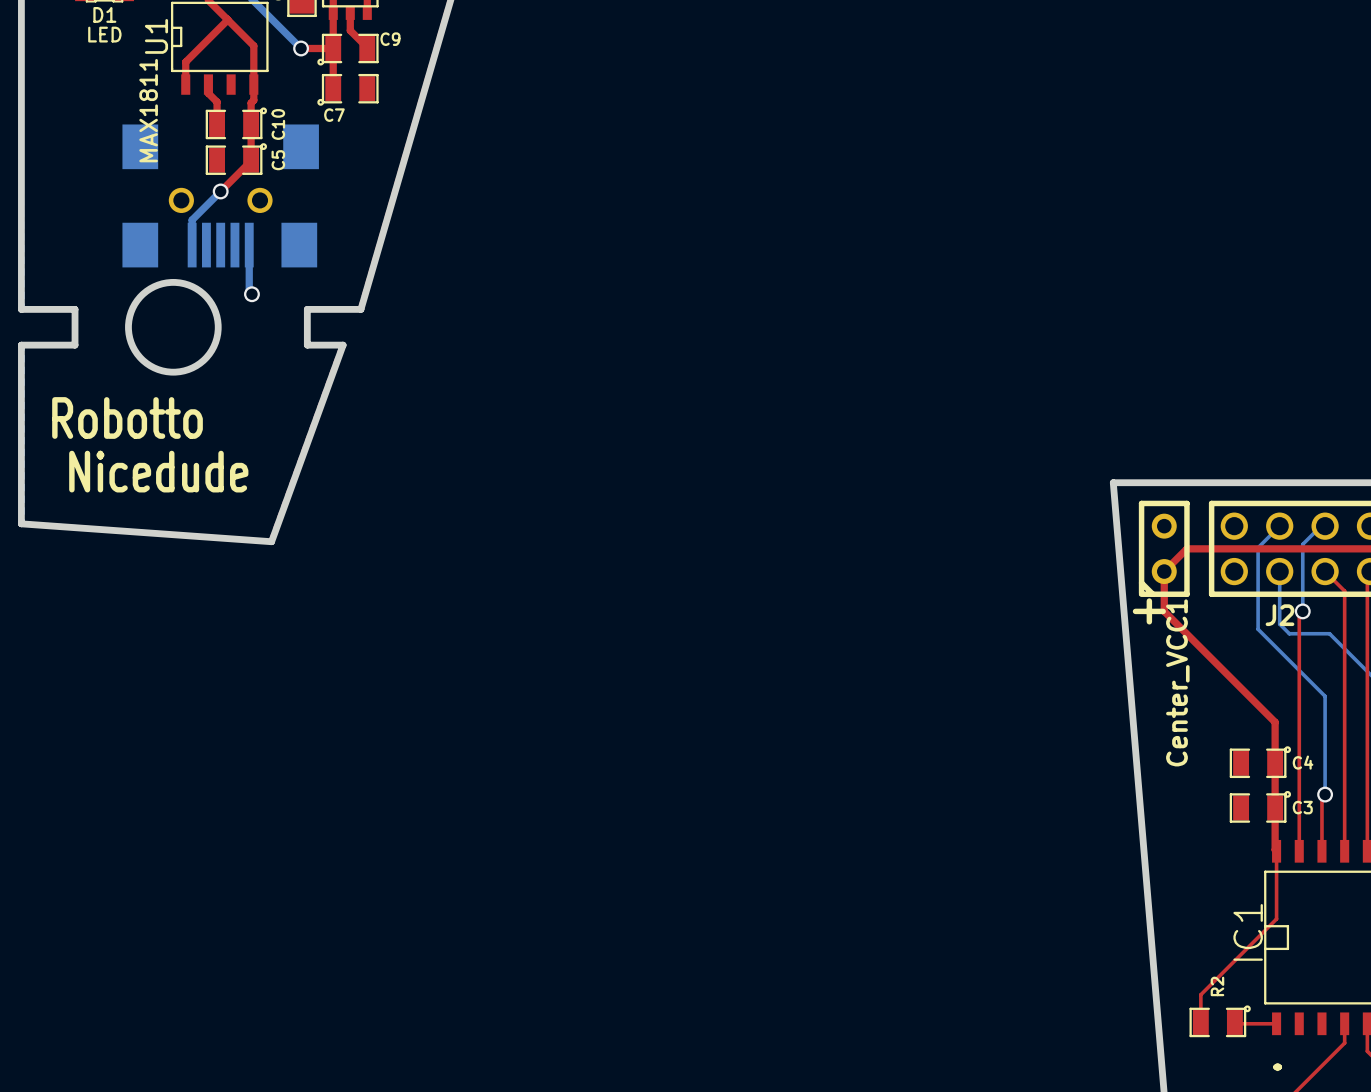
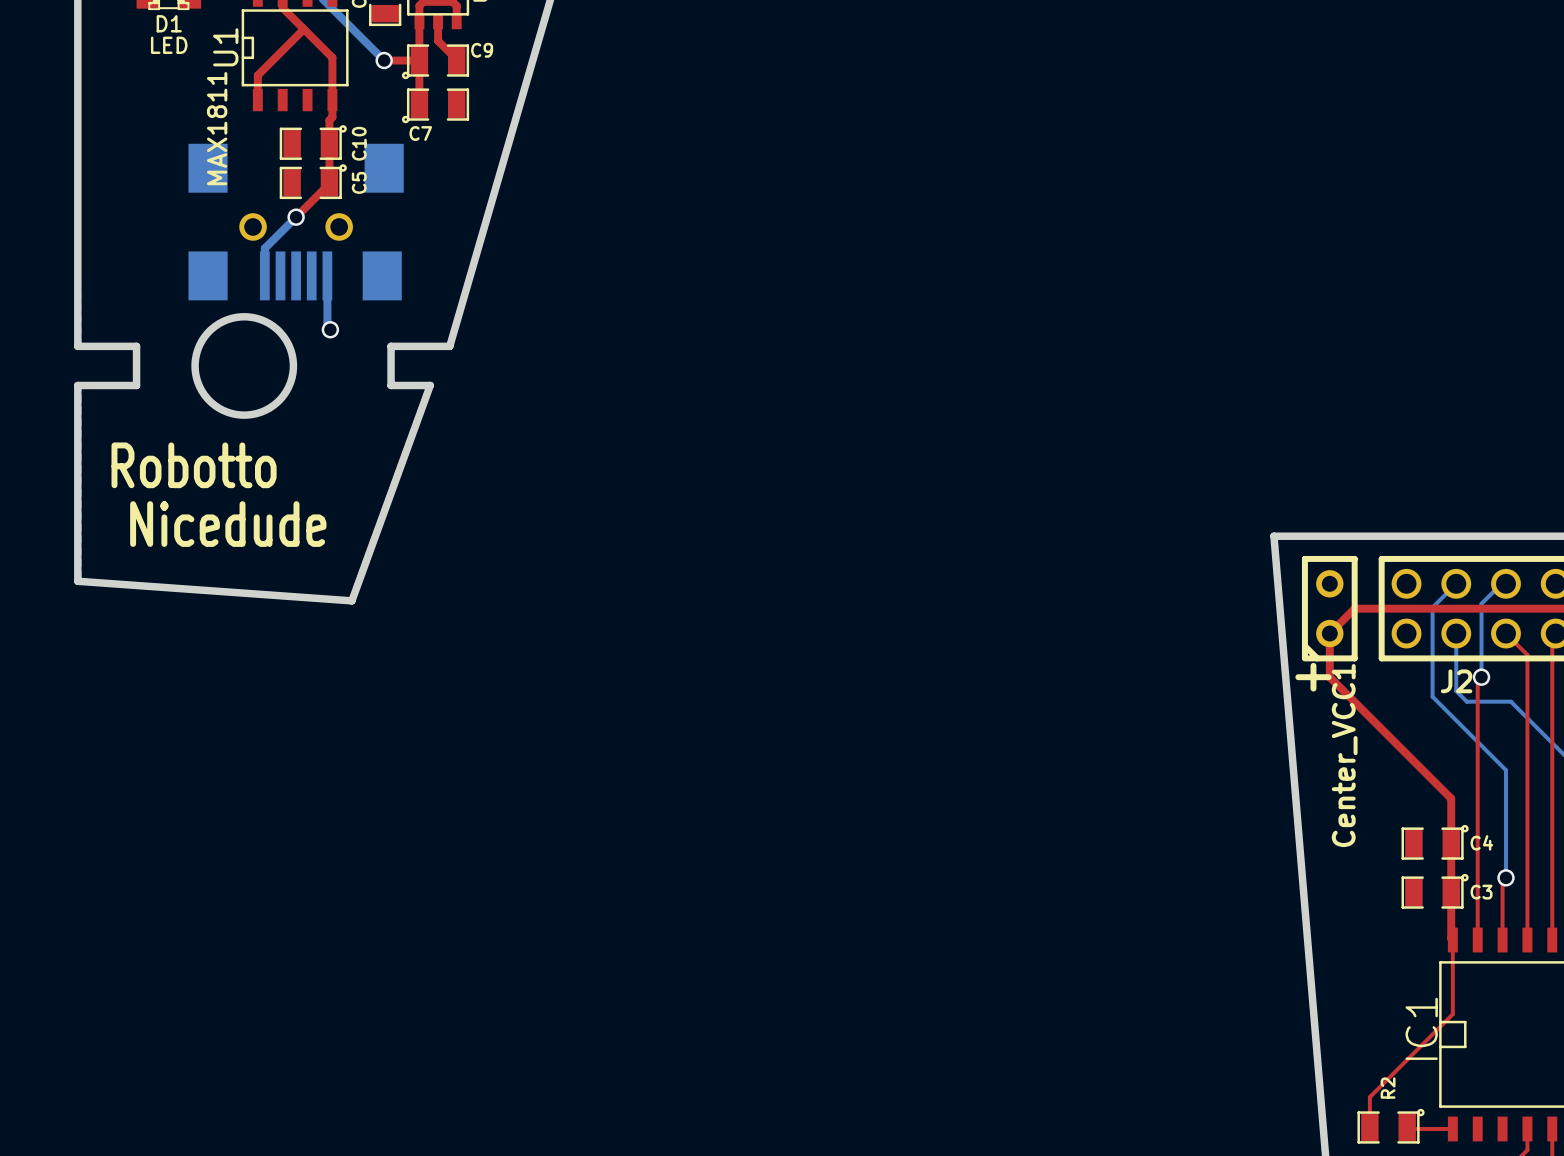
top track: (208, 84) (208, 93) (217, 102) (217, 124) -> none

